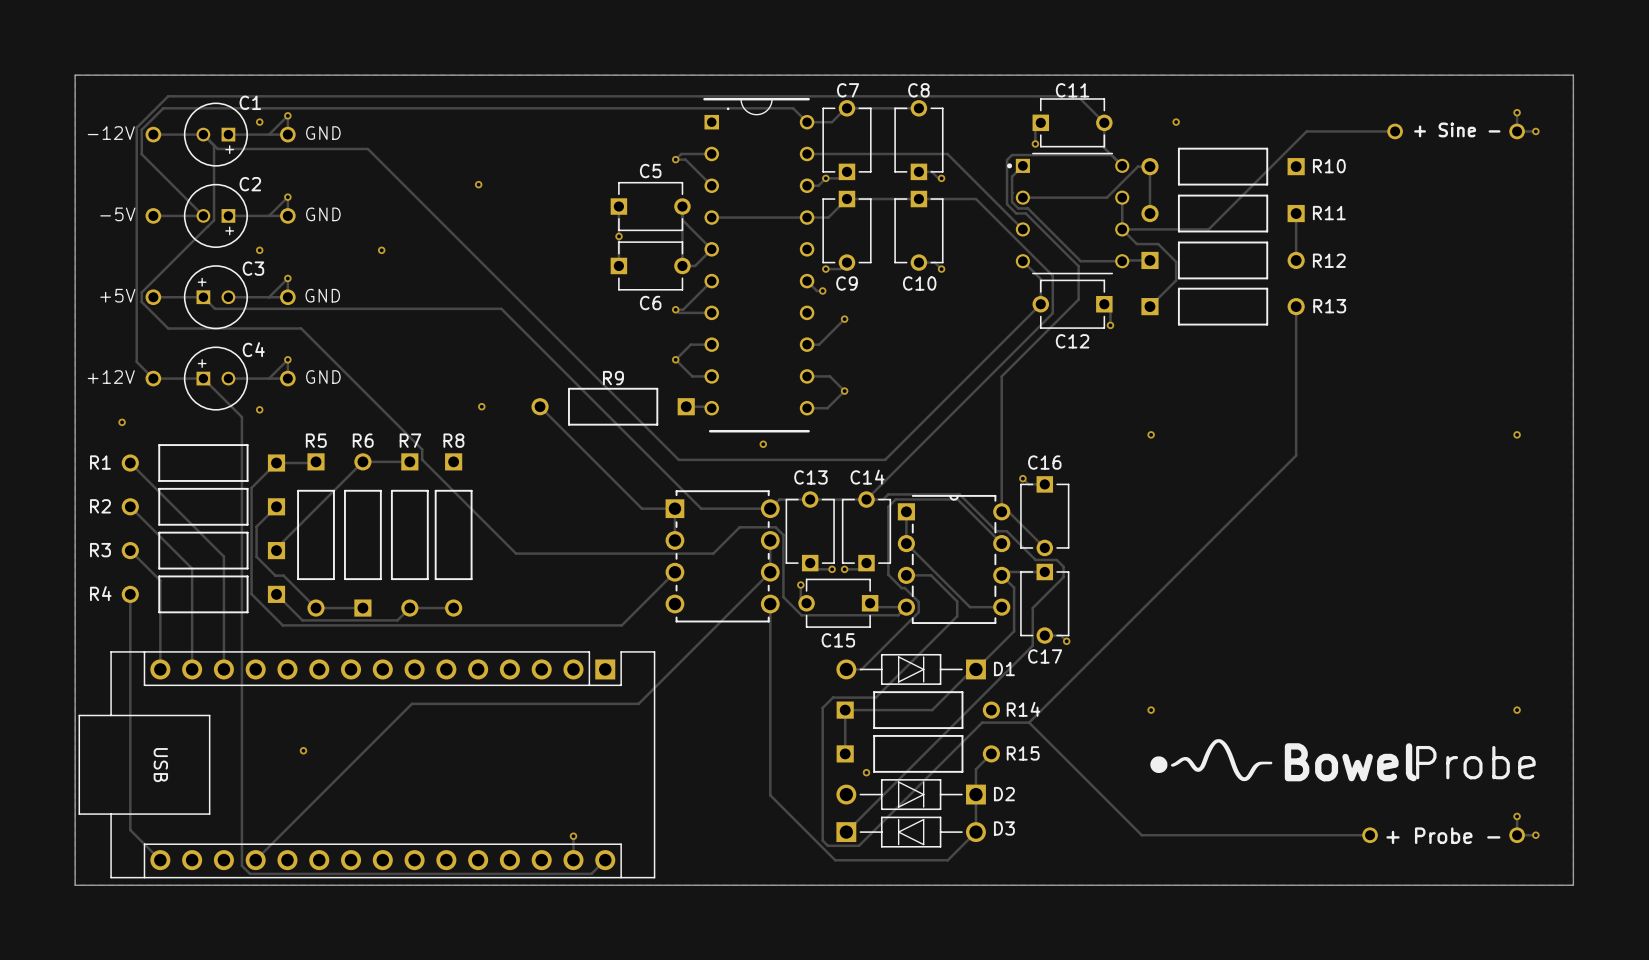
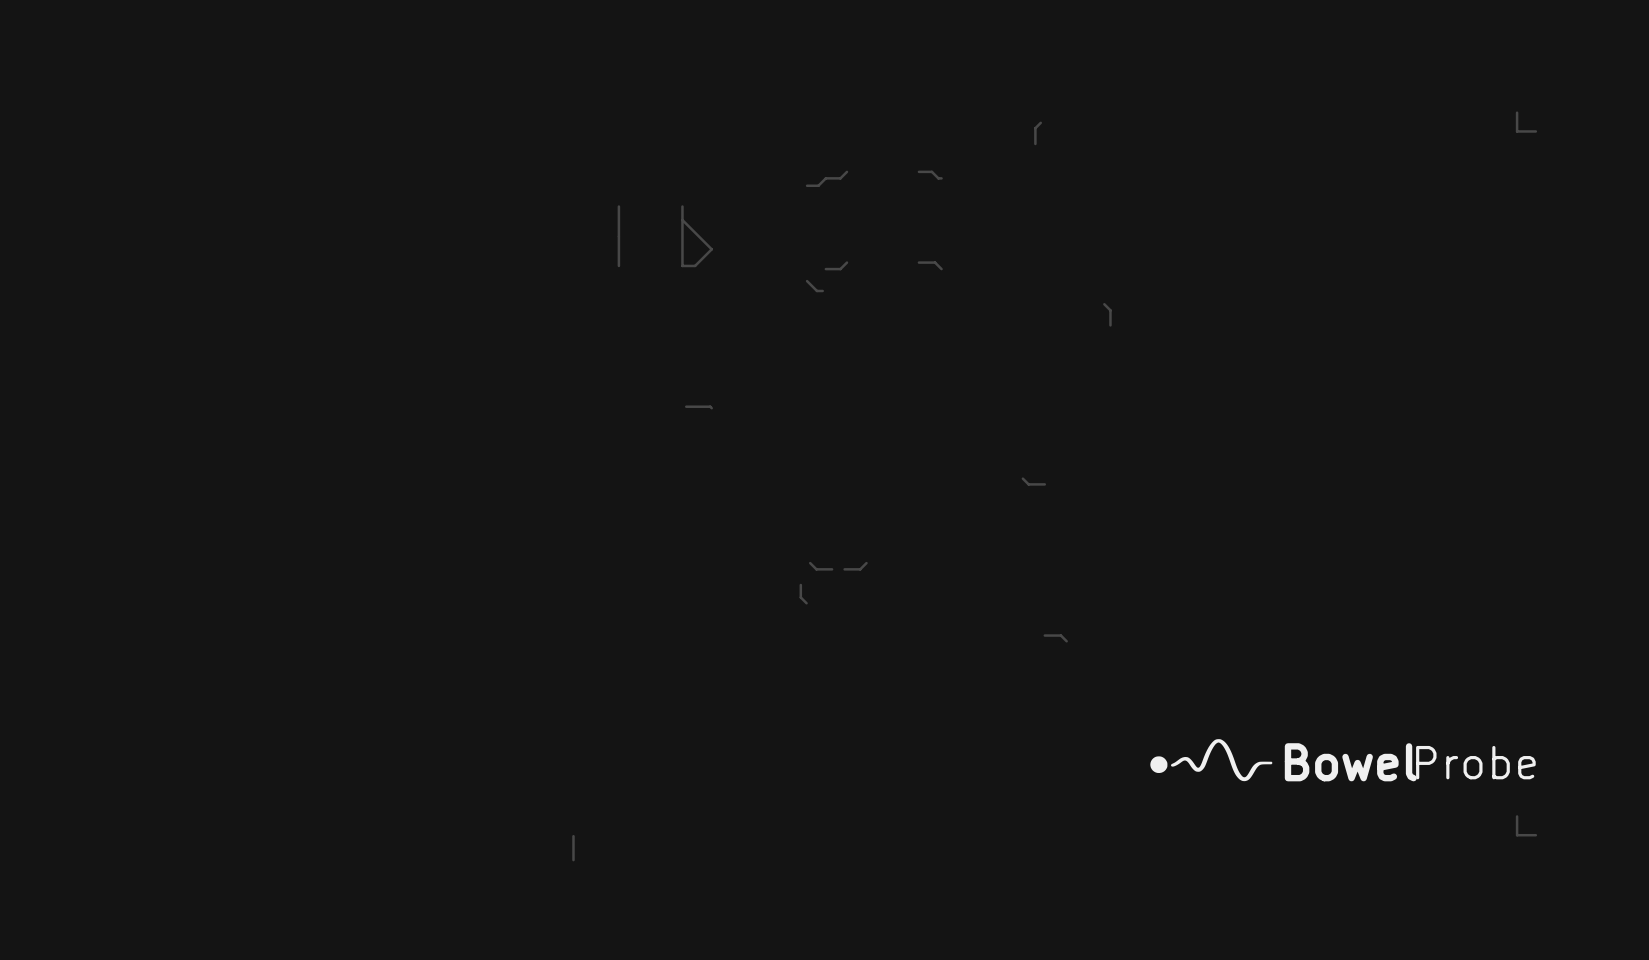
board edge: (75, 75) (1573, 75) (1573, 885) (75, 885) (75, 75) -> none
track: (918, 108) (845, 108) (831, 122) (807, 122) (793, 108) (163, 108) (141, 129) (141, 154) (203, 215) (153, 215) -> none
via: (1517, 112) -> none
via: (287, 115) -> none
via: (259, 122) -> none
C11: (1072, 122) -> none
via: (1176, 122) -> none
text: + Sine - (1457, 129) -> none
track: (1395, 131) (1306, 131) (1208, 229) (1122, 229) -> none
part: (1395, 131) -> none
part: (1517, 131) -> none
via: (1535, 131) -> none
text: -12V (111, 133) -> none
text: GND (323, 133) -> none
track: (153, 134) (203, 134) (217, 148) (367, 148) (678, 459) (885, 459) -> none
part: (153, 134) -> none
C1: (215, 134) -> none
track: (228, 134) (287, 134) (287, 115) (269, 134) -> none
part: (287, 134) -> none
C7: (846, 140) -> none
C8: (918, 140) -> none
via: (1035, 143) -> none
track: (214, 145) (214, 220) (207, 226) -> none
track: (711, 153) (681, 153) (675, 159) (685, 159) (711, 185) -> none
track: (807, 153) (947, 153) (1022, 229) -> none
track: (1111, 155) (1012, 155) (1007, 160) (1007, 204) (1016, 213) (1025, 213) (1078, 266) (1078, 299) (1001, 376) (1001, 511) (1008, 511) (1044, 547) -> none
via: (675, 159) -> none
track: (1022, 165) (1012, 176) (1012, 202) (1018, 208) (1027, 208) (1080, 261) (1149, 260) -> none
track: (1122, 165) (1104, 147) (1104, 122) (1077, 96) (168, 96) (136, 127) (136, 361) (153, 378) (203, 378) (241, 417) (241, 865) (249, 873) (591, 873) (605, 860) -> none
R10: (1223, 166) -> none
via: (825, 178) -> none
via: (941, 178) -> none
via: (478, 184) -> none
via: (287, 197) -> none
track: (1022, 197) (1106, 197) (1137, 166) (1149, 166) (1149, 213) -> none
track: (1122, 197) (1122, 229) -> none
C5: (650, 206) -> none
part: (1068, 213) -> none
R11: (1223, 213) -> none
track: (1296, 213) (1296, 260) -> none
text: -5V (117, 214) -> none
text: GND (323, 214) -> none
part: (153, 215) -> none
C2: (215, 215) -> none
track: (228, 215) (287, 215) (287, 197) (269, 215) -> none
part: (287, 215) -> none
track: (711, 217) (828, 217) (846, 199) (976, 199) (1052, 275) (1052, 313) (866, 499) -> none
track: (207, 226) (141, 292) (141, 302) (168, 328) (301, 328) (422, 449) (422, 459) (516, 553) (713, 553) (739, 527) (775, 527) (783, 535) (783, 597) (801, 615) (898, 615) (906, 607) (874, 607) (870, 603) -> none
track: (1122, 229) (1136, 244) (1158, 244) (1176, 261) (1176, 280) (1149, 306) -> none
C9: (846, 230) -> none
C10: (918, 230) -> none
via: (619, 236) -> none
via: (259, 250) -> none
via: (381, 250) -> none
R12: (1223, 260) -> none
track: (1022, 261) (1040, 279) (1040, 304) (885, 459) -> none
C6: (650, 265) -> none
part: (758, 265) -> none
via: (825, 269) -> none
via: (941, 269) -> none
via: (287, 278) -> none
track: (711, 281) (683, 309) (675, 309) (678, 312) (711, 312) -> none
via: (822, 290) -> none
text: +5V (117, 295) -> none
text: GND (322, 295) -> none
track: (153, 297) (203, 297) (214, 308) (501, 308) (701, 508) (770, 508) (779, 499) (883, 499) (888, 494) (959, 494) (996, 531) (1006, 531) (1035, 559) (1056, 559) (1063, 566) (1063, 577) (1032, 608) (1032, 645) (846, 832) -> none
part: (153, 297) -> none
C3: (215, 297) -> none
track: (228, 297) (287, 297) (287, 278) (269, 297) -> none
part: (287, 297) -> none
C12: (1072, 304) -> none
R13: (1223, 306) -> none
track: (1296, 306) (1296, 455) (1029, 722) -> none
via: (675, 309) -> none
track: (844, 319) (819, 344) (807, 344) -> none
via: (844, 319) -> none
via: (1110, 325) -> none
track: (711, 344) (690, 344) (675, 359) (692, 376) (711, 376) -> none
via: (287, 359) -> none
via: (675, 359) -> none
track: (807, 376) (829, 376) (844, 391) (827, 408) (807, 408) -> none
text: +12V (111, 377) -> none
text: GND (323, 377) -> none
part: (153, 378) -> none
C4: (215, 378) -> none
track: (228, 378) (287, 378) (287, 359) (269, 378) -> none
part: (287, 378) -> none
via: (844, 391) -> none
via: (481, 406) -> none
track: (540, 406) (642, 508) (674, 508) (674, 540) -> none
R9: (613, 406) -> none
via: (259, 409) -> none
via: (122, 422) -> none
via: (1151, 434) -> none
via: (1517, 434) -> none
via: (763, 444) -> none
track: (316, 461) (276, 463) (251, 487) (251, 594) (282, 625) (621, 625) (674, 572) -> none
track: (409, 461) (362, 461) (276, 548) (276, 550) -> none
track: (130, 463) (223, 556) (223, 669) -> none
R1: (203, 463) -> none
via: (1022, 478) -> none
track: (130, 506) (192, 568) (192, 669) -> none
R2: (203, 506) -> none
track: (276, 506) (256, 526) (256, 556) (275, 575) (283, 575) (316, 608) (362, 608) -> none
track: (906, 511) (906, 543) (969, 607) (1001, 607) -> none
C16: (1044, 516) -> none
C13: (810, 531) -> none
C14: (866, 531) -> none
R5: (316, 534) -> none
R6: (362, 534) -> none
R7: (409, 534) -> none
R8: (453, 534) -> none
track: (770, 540) (770, 572) (638, 703) (411, 703) (255, 860) -> none
track: (1001, 543) (957, 499) (895, 499) (888, 506) (888, 574) (918, 602) (918, 612) (861, 669) (846, 669) -> none
track: (130, 550) (160, 580) (160, 669) -> none
R3: (203, 550) -> none
part: (722, 556) -> none
part: (954, 559) -> none
via: (832, 569) -> none
via: (844, 569) -> none
track: (1044, 571) (1005, 571) (1001, 575) (1014, 587) (1014, 631) (932, 710) (845, 710) (845, 753) -> none
track: (906, 575) (931, 575) (957, 601) (957, 616) (875, 697) (833, 697) (822, 707) (822, 840) (827, 845) (859, 845) (982, 722) (1029, 722) -> none
via: (800, 584) -> none
track: (130, 594) (130, 830) (160, 860) -> none
R4: (203, 594) -> none
track: (276, 594) (302, 620) (397, 620) (409, 608) (453, 608) -> none
C15: (838, 603) -> none
C17: (1044, 603) -> none
track: (770, 604) (770, 795) (835, 860) (947, 860) (975, 832) (975, 769) (991, 753) -> none
via: (1066, 641) -> none
D1: (911, 669) -> none
R14: (918, 710) -> none
via: (1151, 710) -> none
via: (1517, 710) -> none
track: (1029, 722) (1141, 835) (1370, 835) (1370, 839) -> none
via: (303, 750) -> none
R15: (918, 753) -> none
part: (366, 764) -> none
via: (866, 772) -> none
D2: (911, 794) -> none
via: (1517, 816) -> none
D3: (911, 832) -> none
part: (1370, 835) -> none
text: + Probe - (1443, 835) -> none
part: (1517, 835) -> none
via: (1535, 835) -> none
via: (573, 836) -> none

